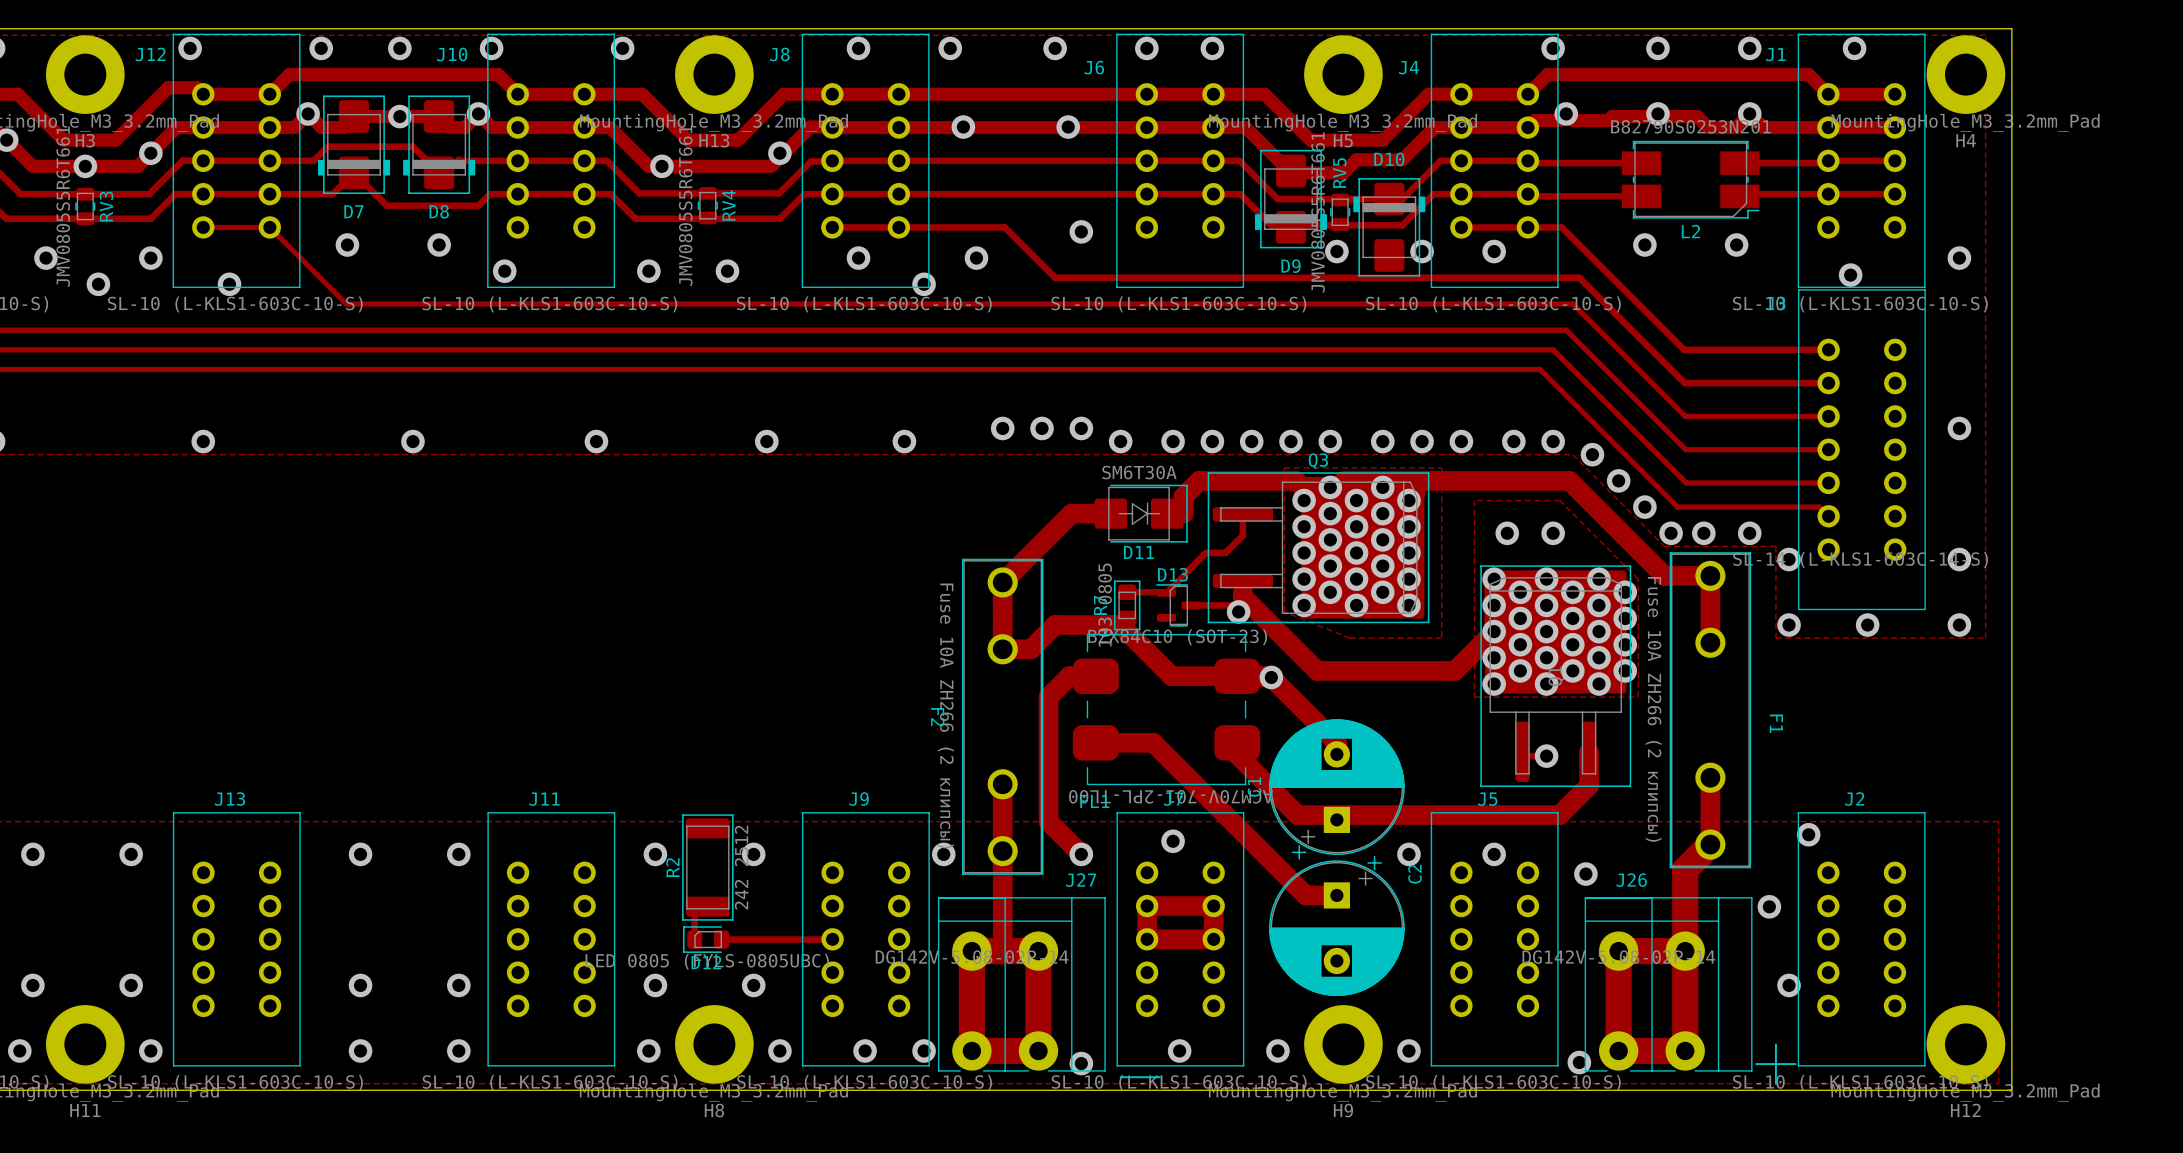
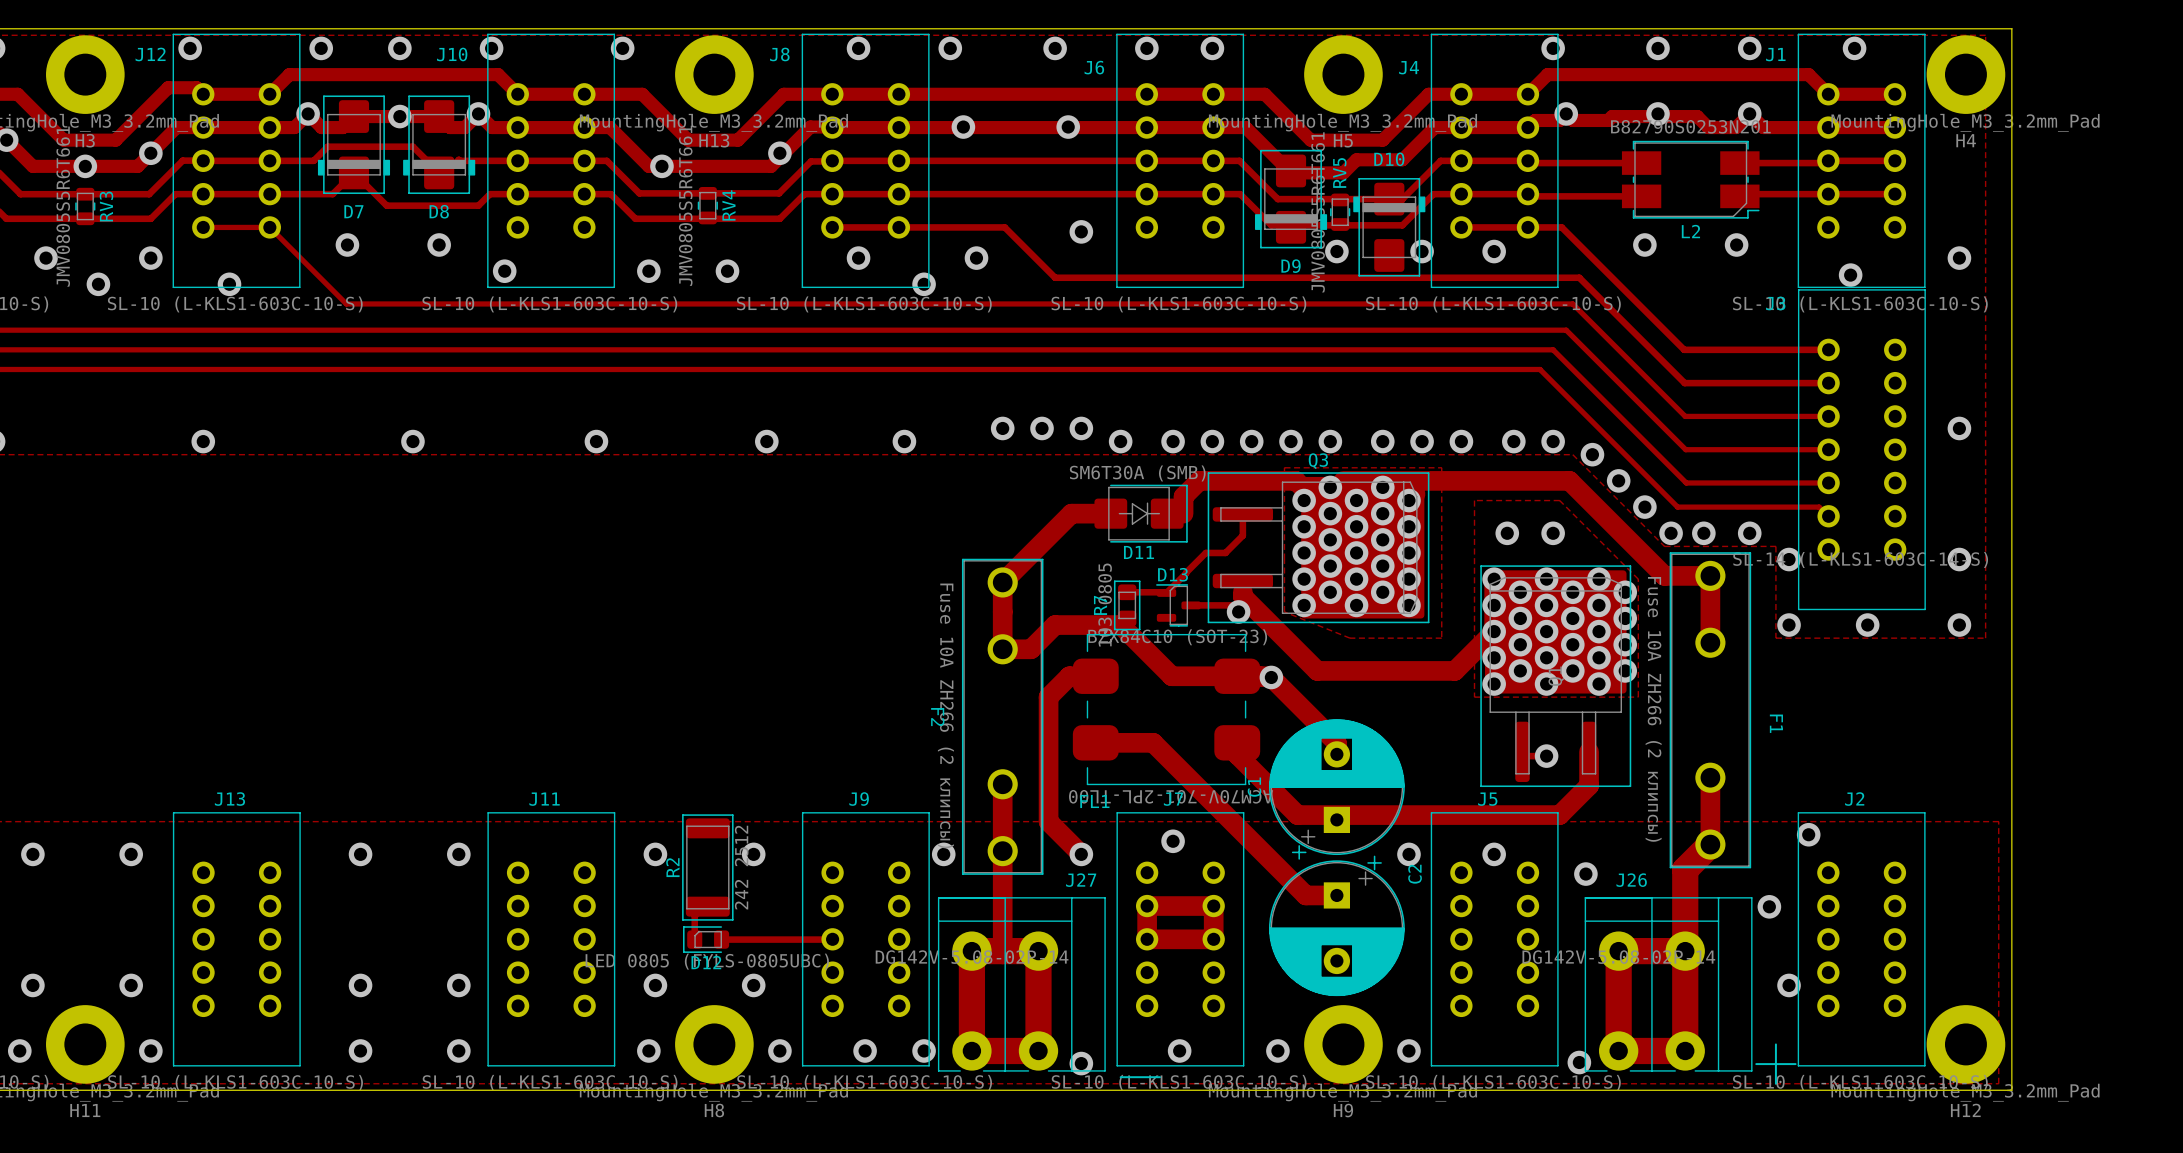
D11 value: SM6T30A (1139, 472) -> SM6T30A (SMB) (1137, 473)

